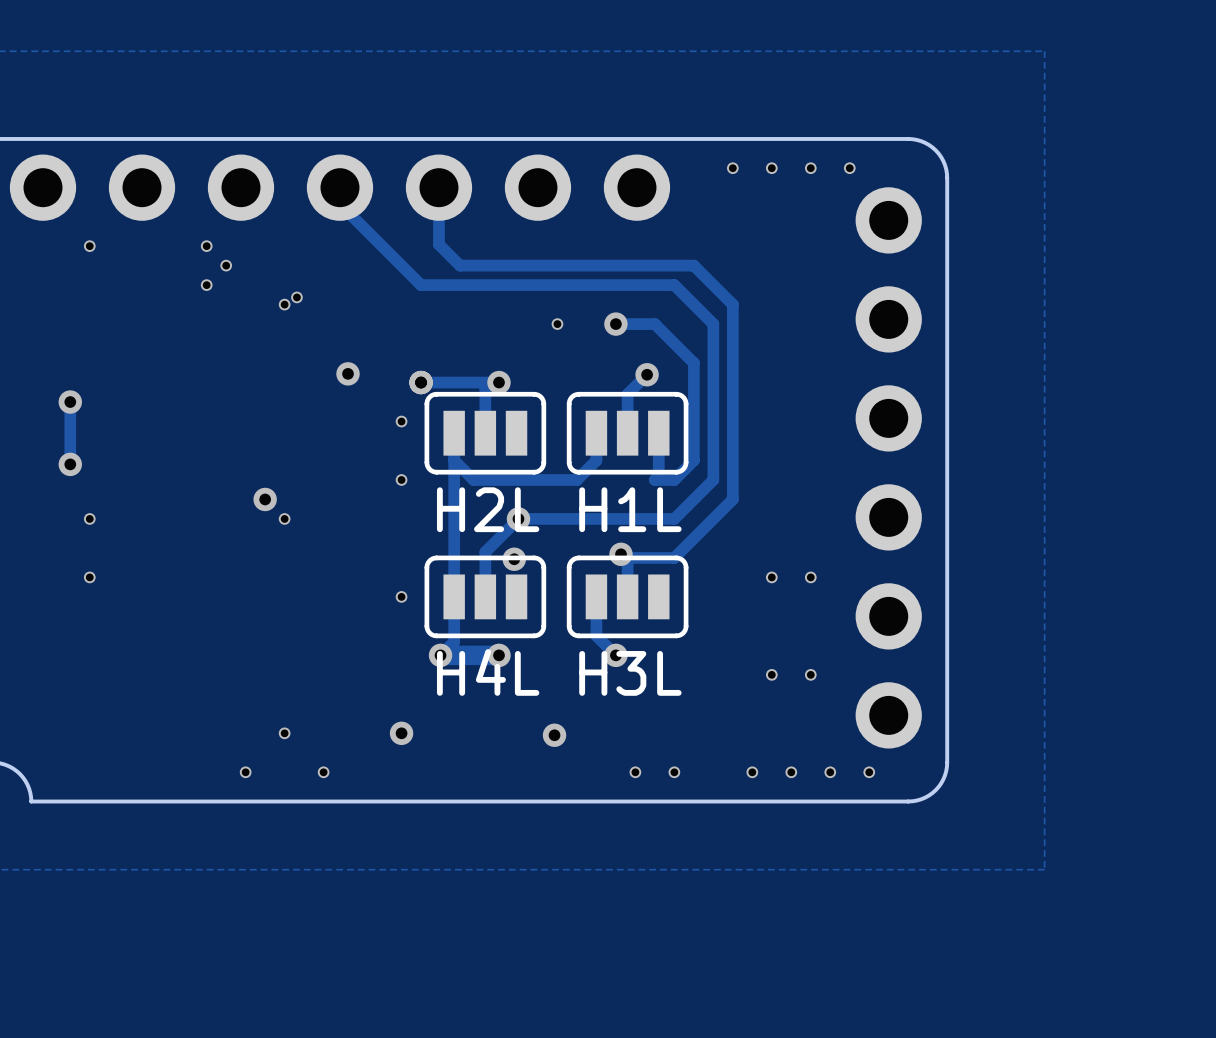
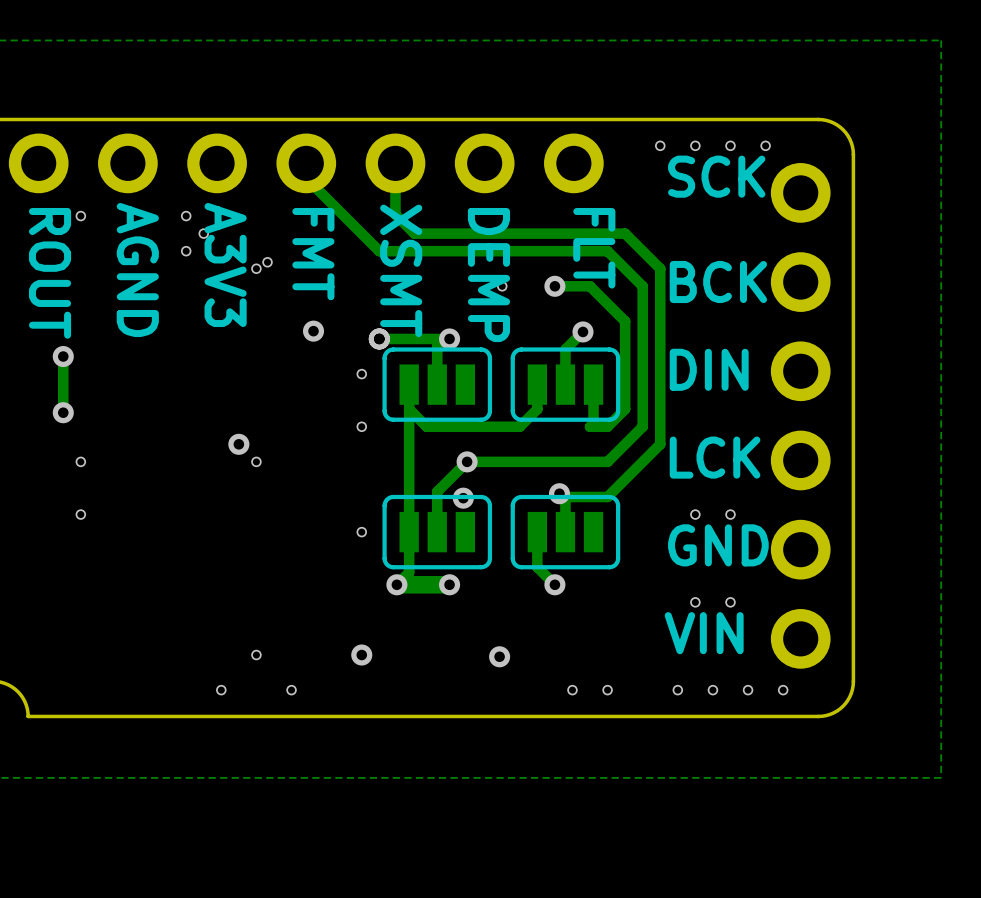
text: none -> SCK (716, 176)
text: none -> FLT (594, 248)
text: none -> FMT (313, 254)
text: none -> A3V3 (225, 264)
text: none -> AGND (137, 270)
text: none -> XSMT (401, 270)
text: none -> ROUT (50, 273)
text: none -> DEMP (488, 275)
text: none -> BCK (718, 282)
text: none -> DIN (709, 369)
H2L name: H2L (488, 509) -> none
H1L name: H1L (630, 509) -> none
text: none -> LCK (715, 457)
text: none -> GND (718, 545)
H4L name: H4L (488, 672) -> none
H3L name: H3L (630, 673) -> none
text: none -> VIN (704, 633)

